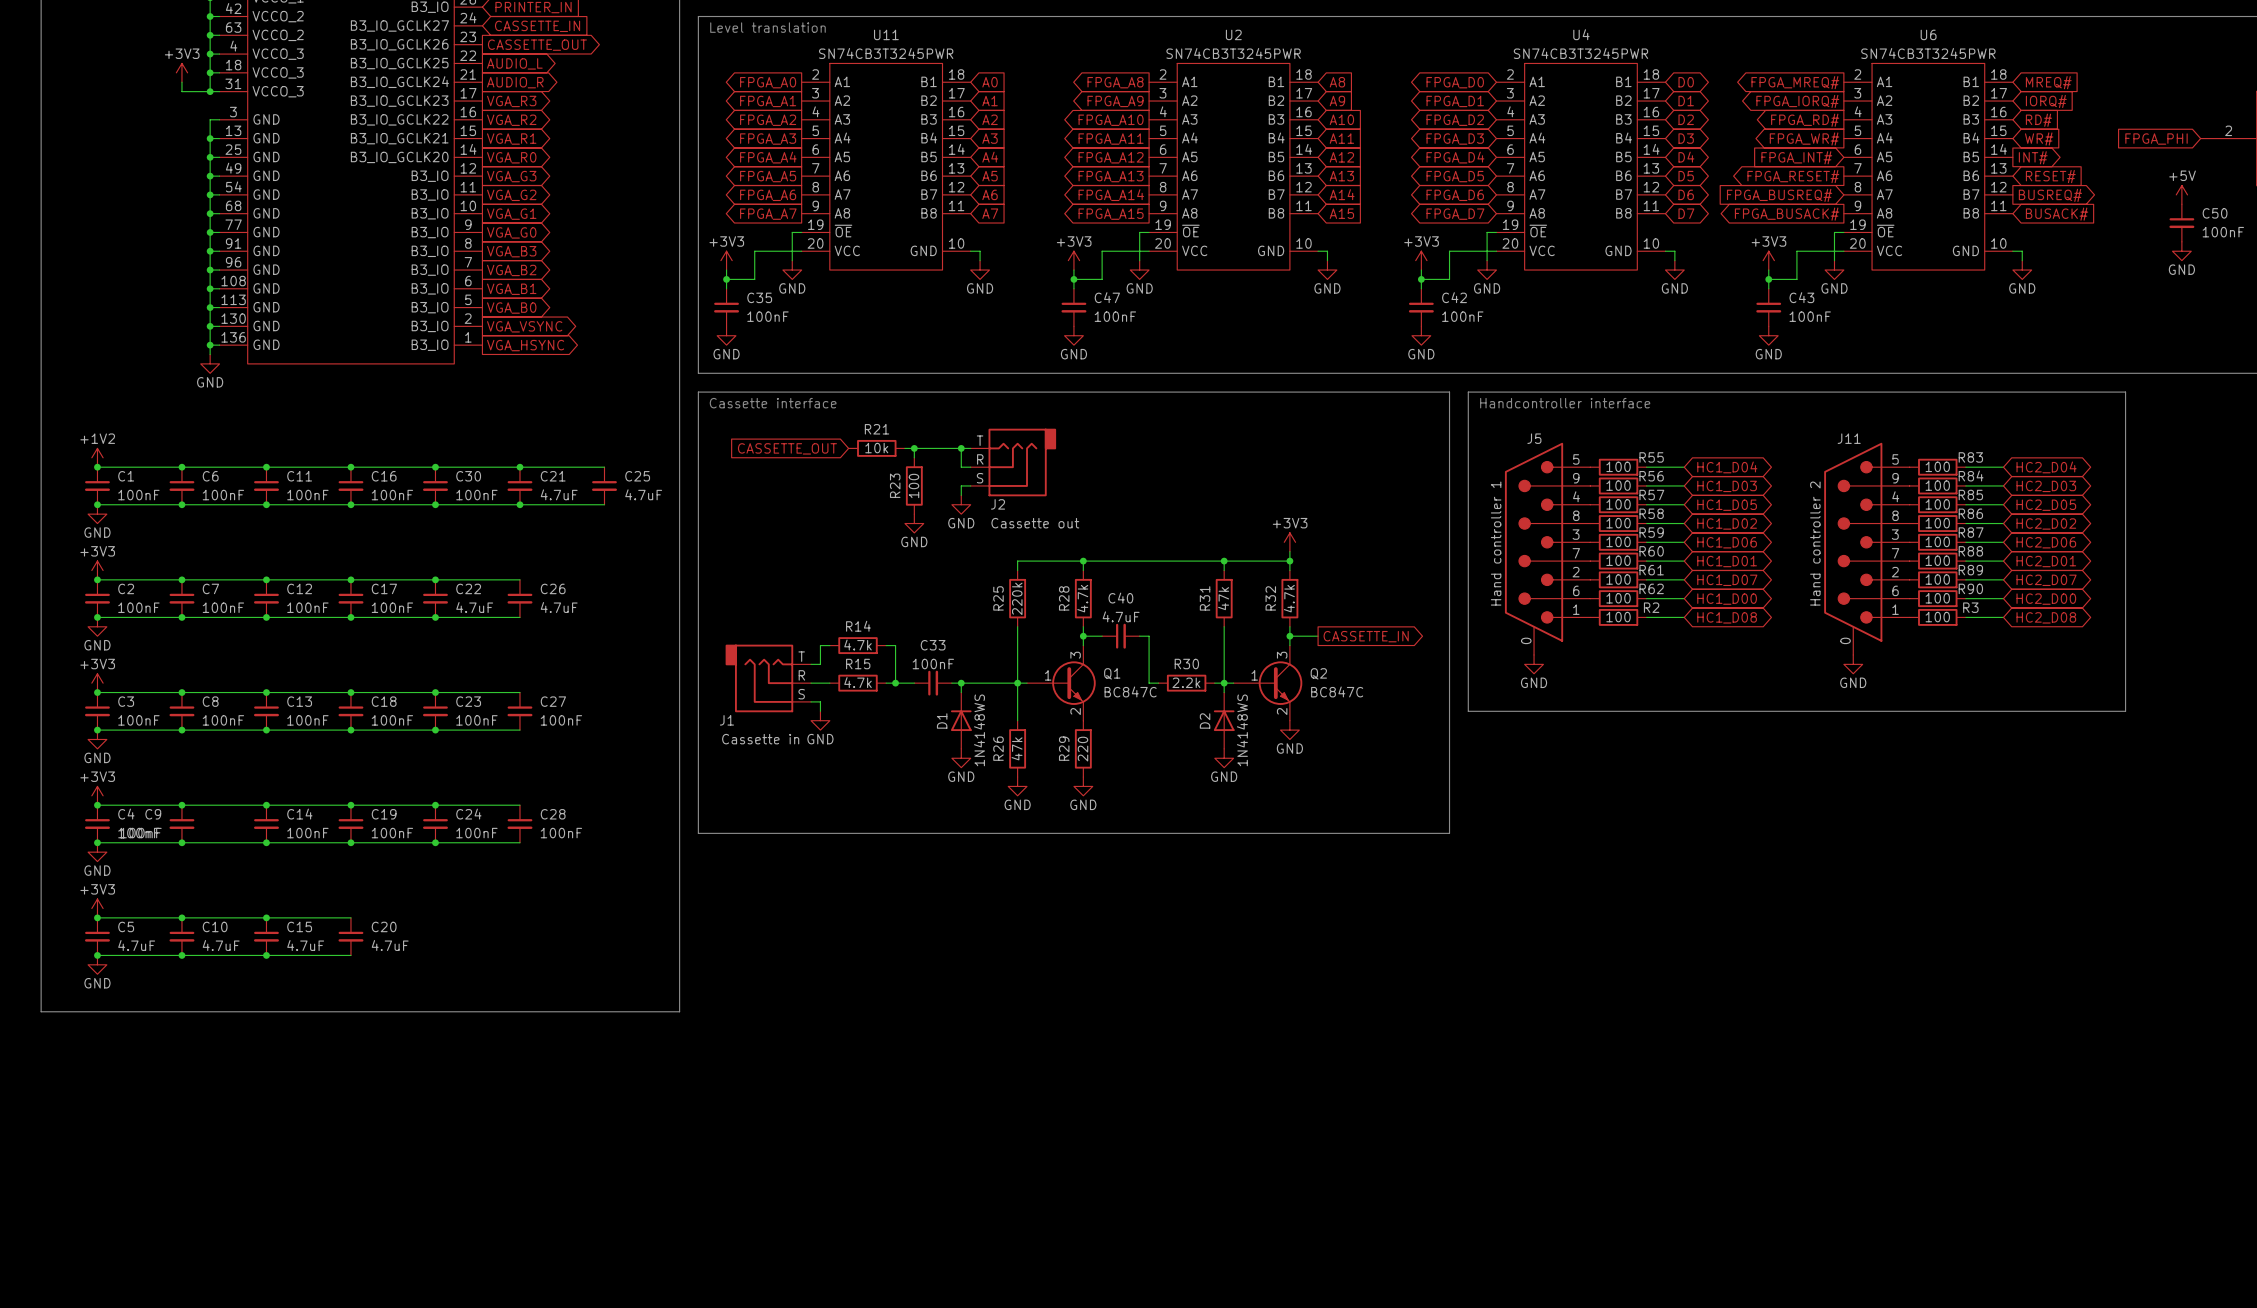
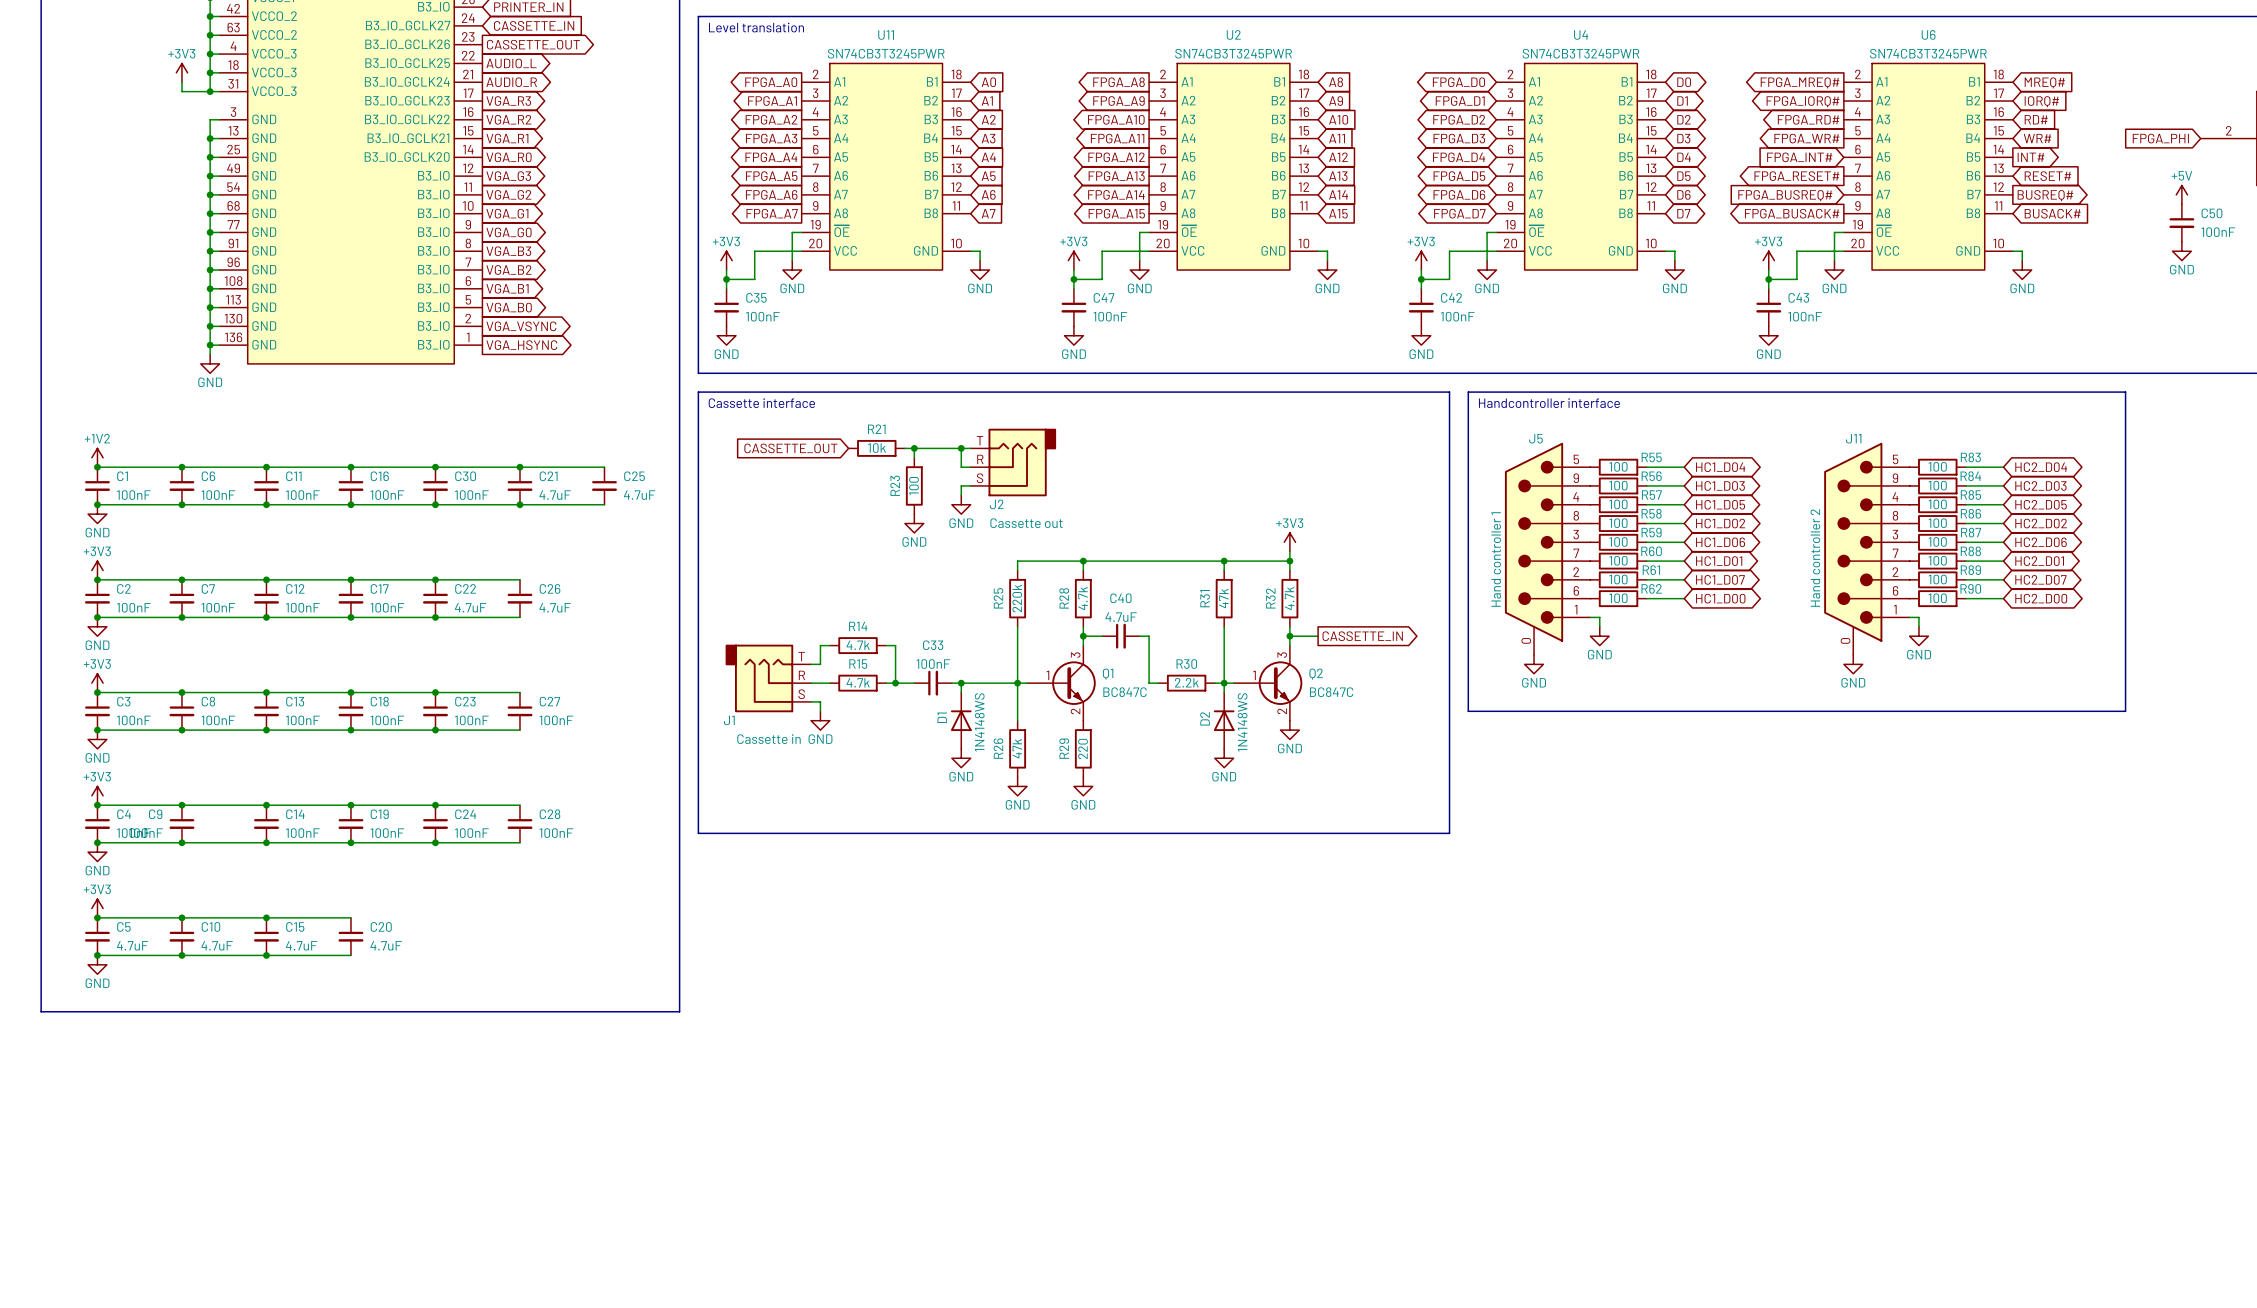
R2: 100 (1618, 617) -> none
wire: (1646, 617) (1684, 617) -> none
global label: HC1_D08 (1727, 617) -> none
R3: 100 (1937, 617) -> none
wire: (1965, 617) (2003, 617) -> none
global label: HC2_D08 (2046, 617) -> none
power symbol: none -> GND (1599, 636)
power symbol: none -> GND (1918, 636)

